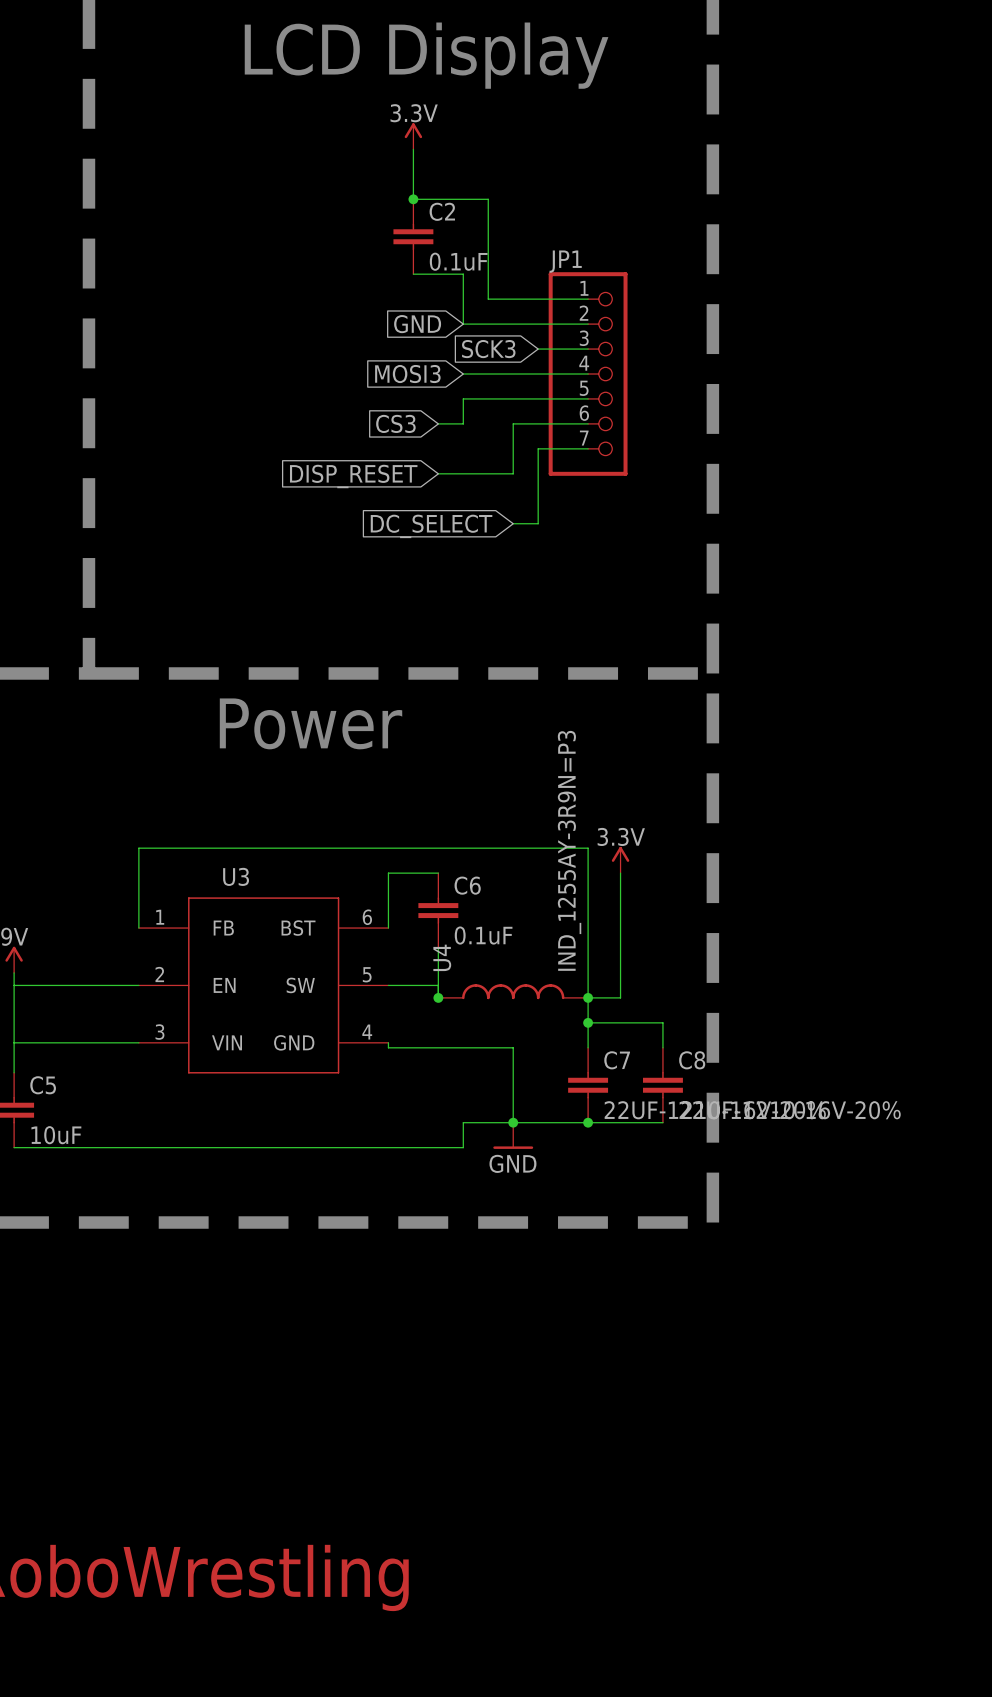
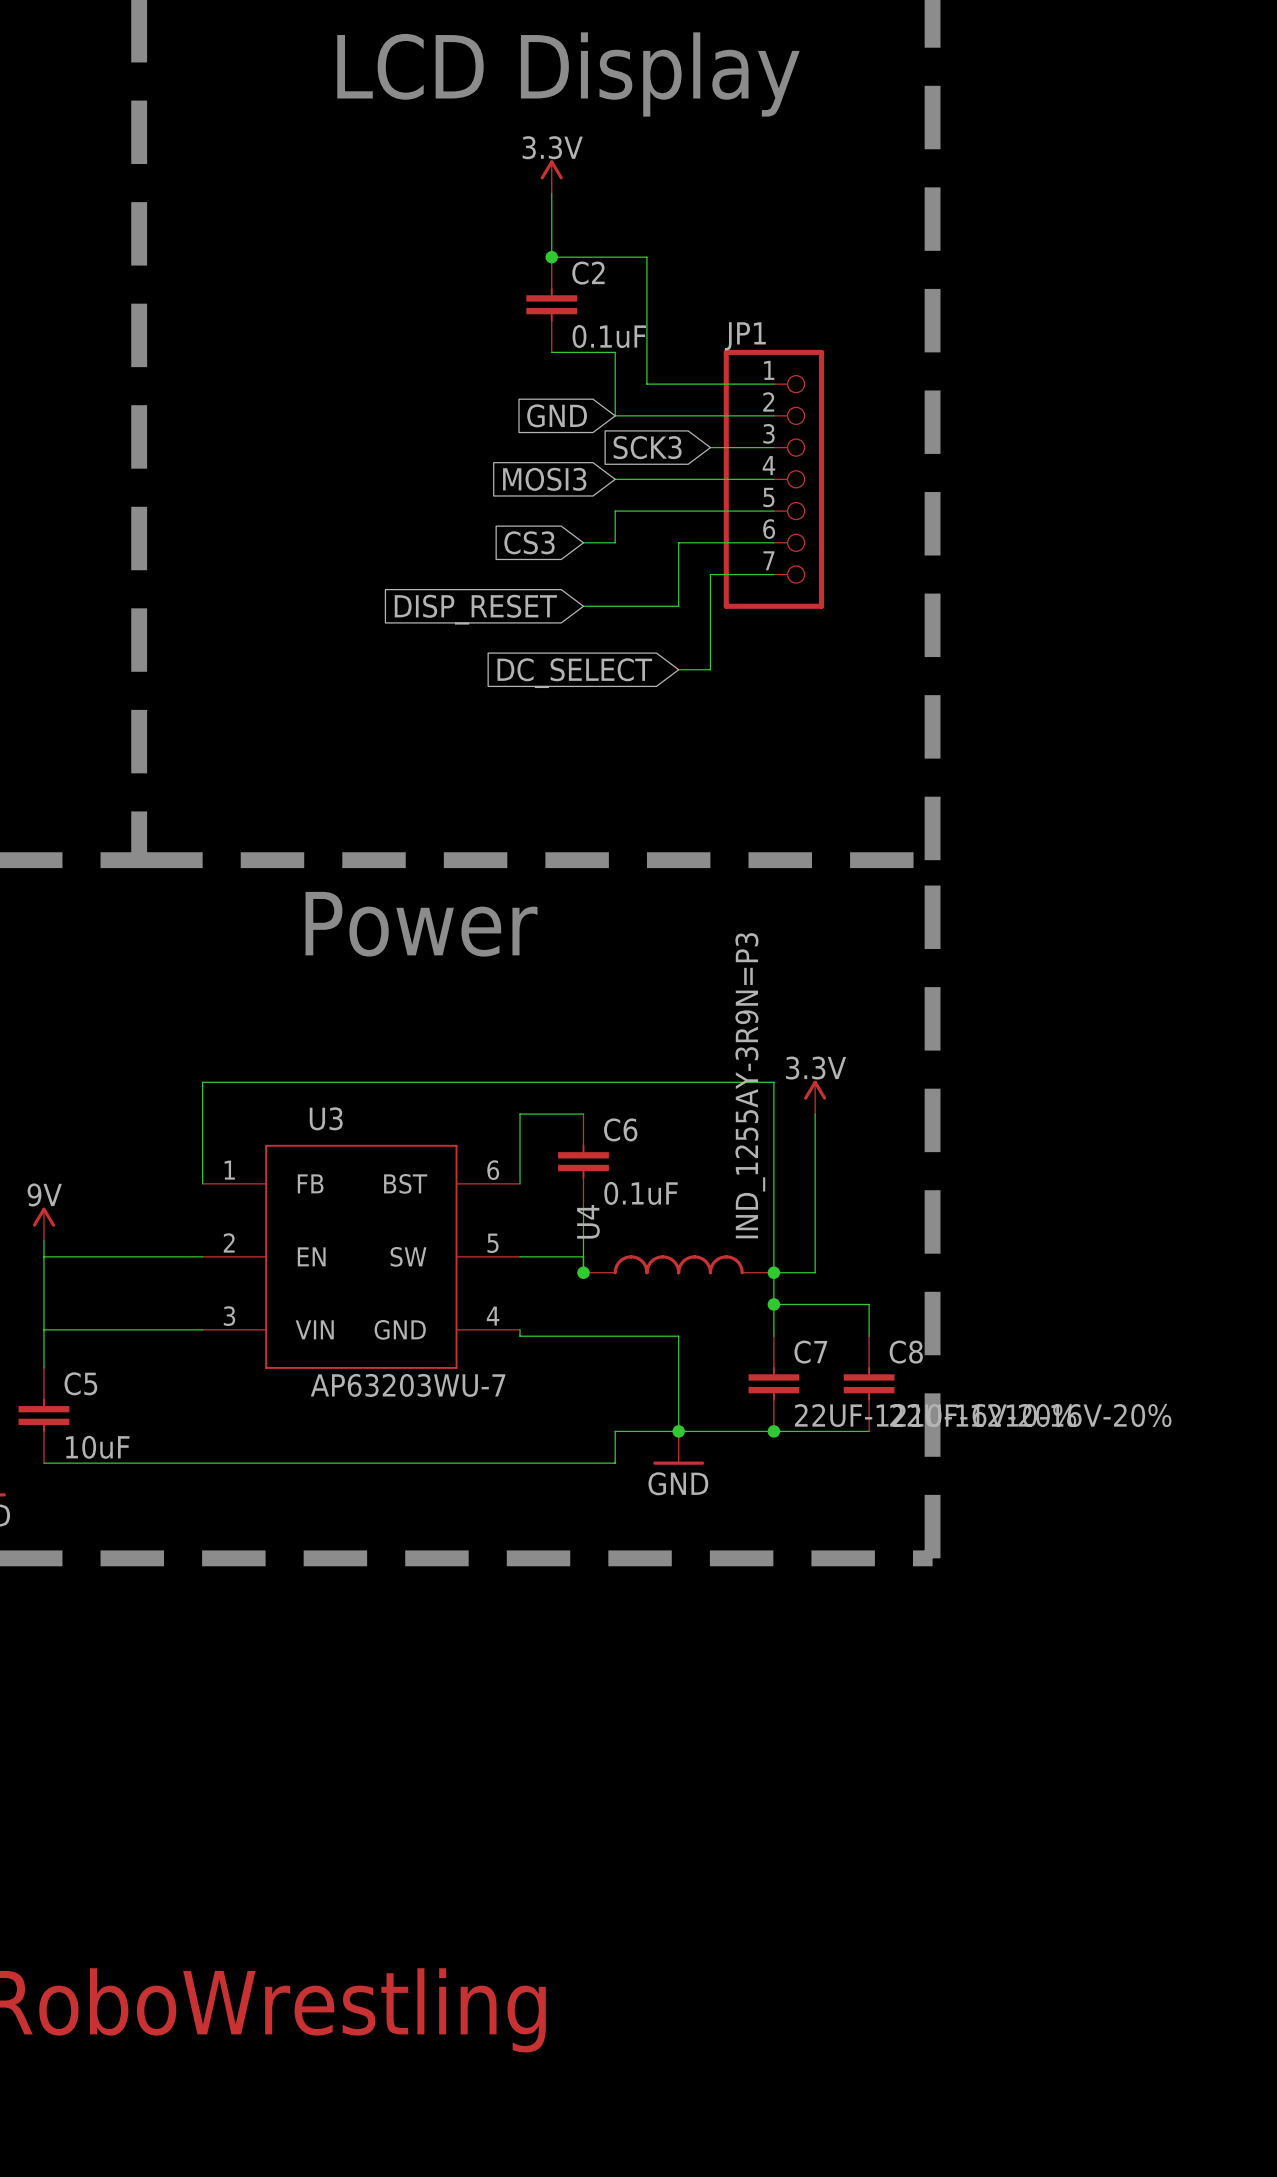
U3 value: none -> AP63203WU-7 (408, 1385)

